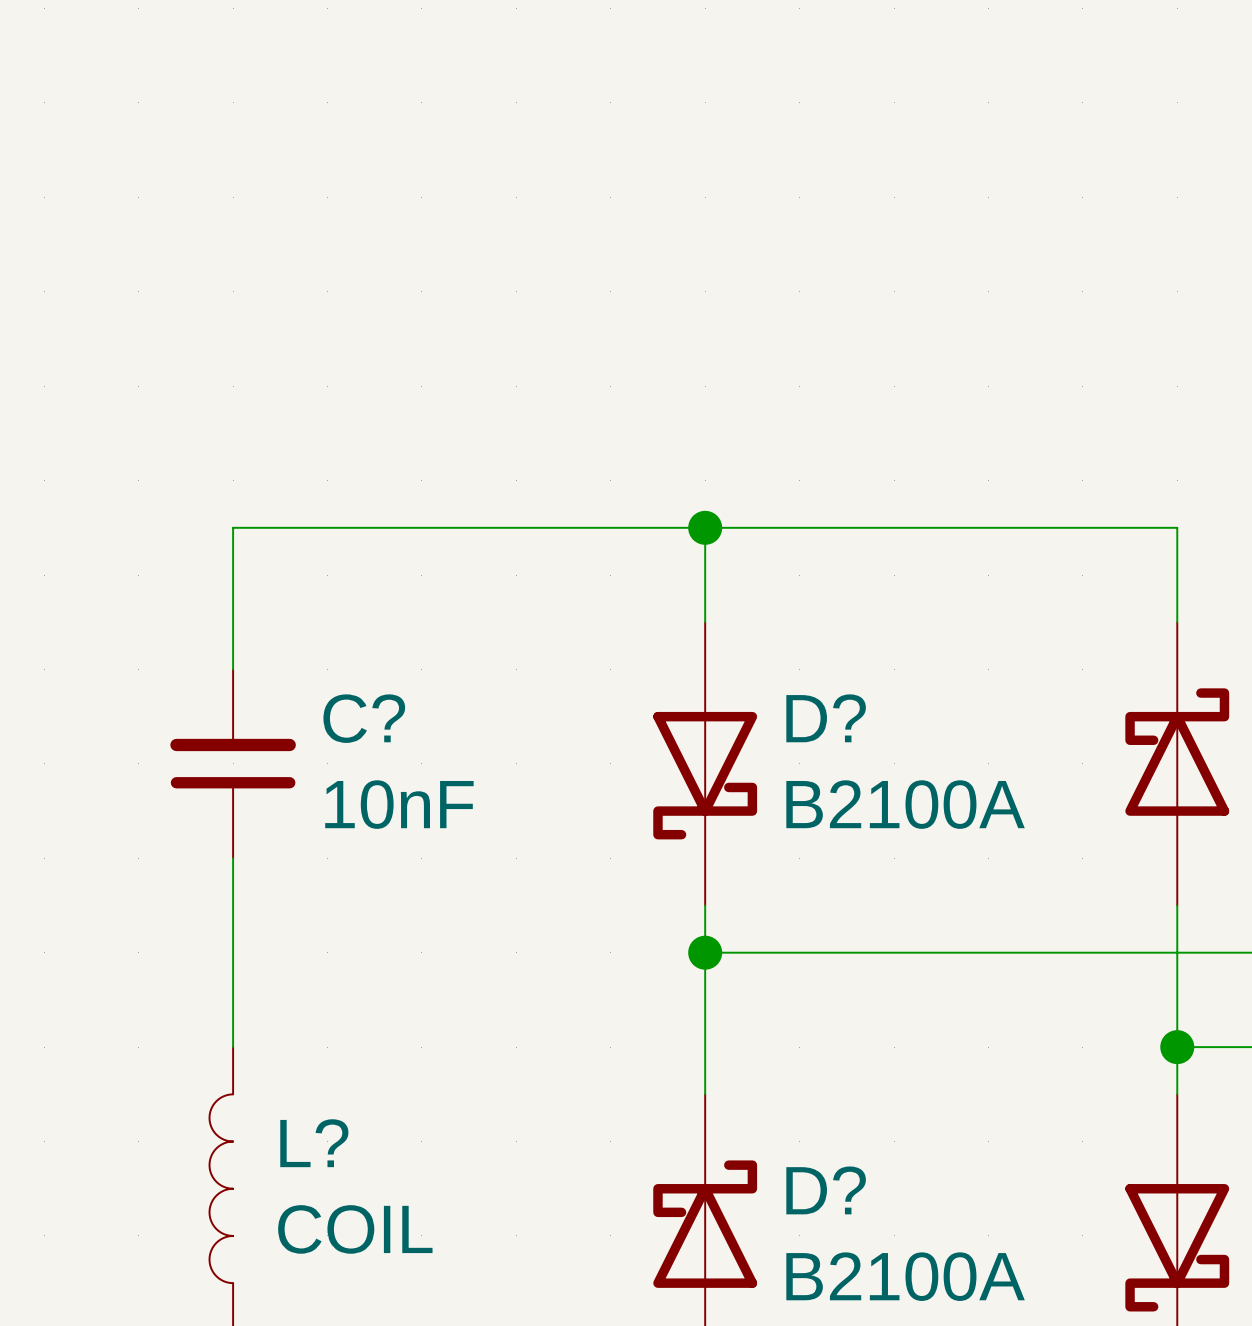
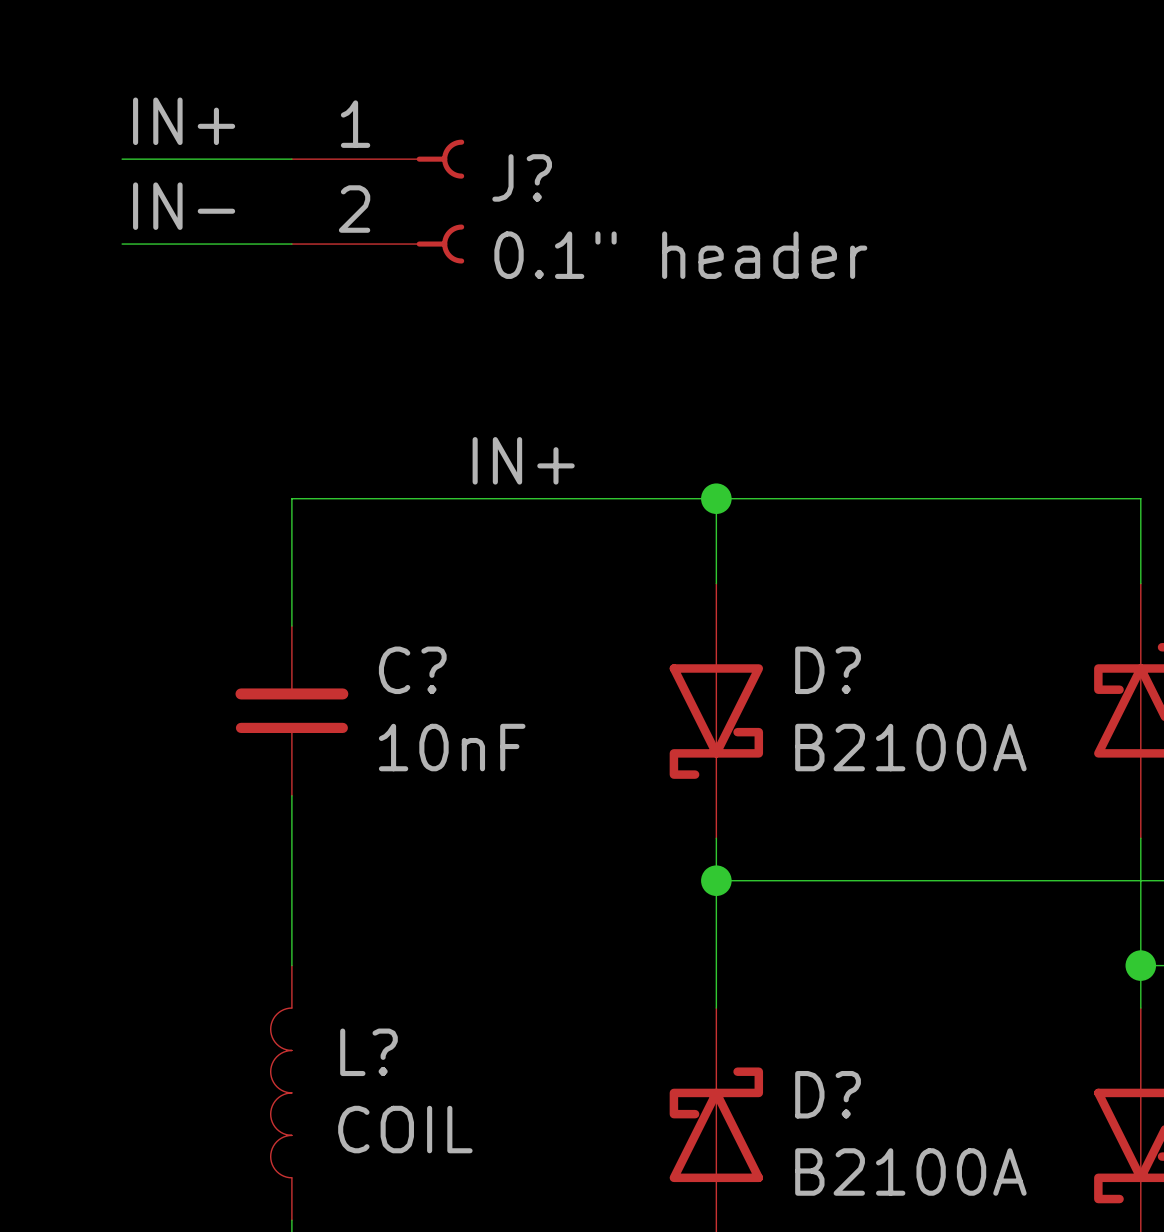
label: none -> IN+ (184, 121)
wire: none -> (122, 159) (291, 159)
J?: none -> 0.1" header (378, 201)
label: none -> IN- (184, 206)
wire: none -> (122, 244) (291, 244)
label: none -> IN+ (523, 460)

